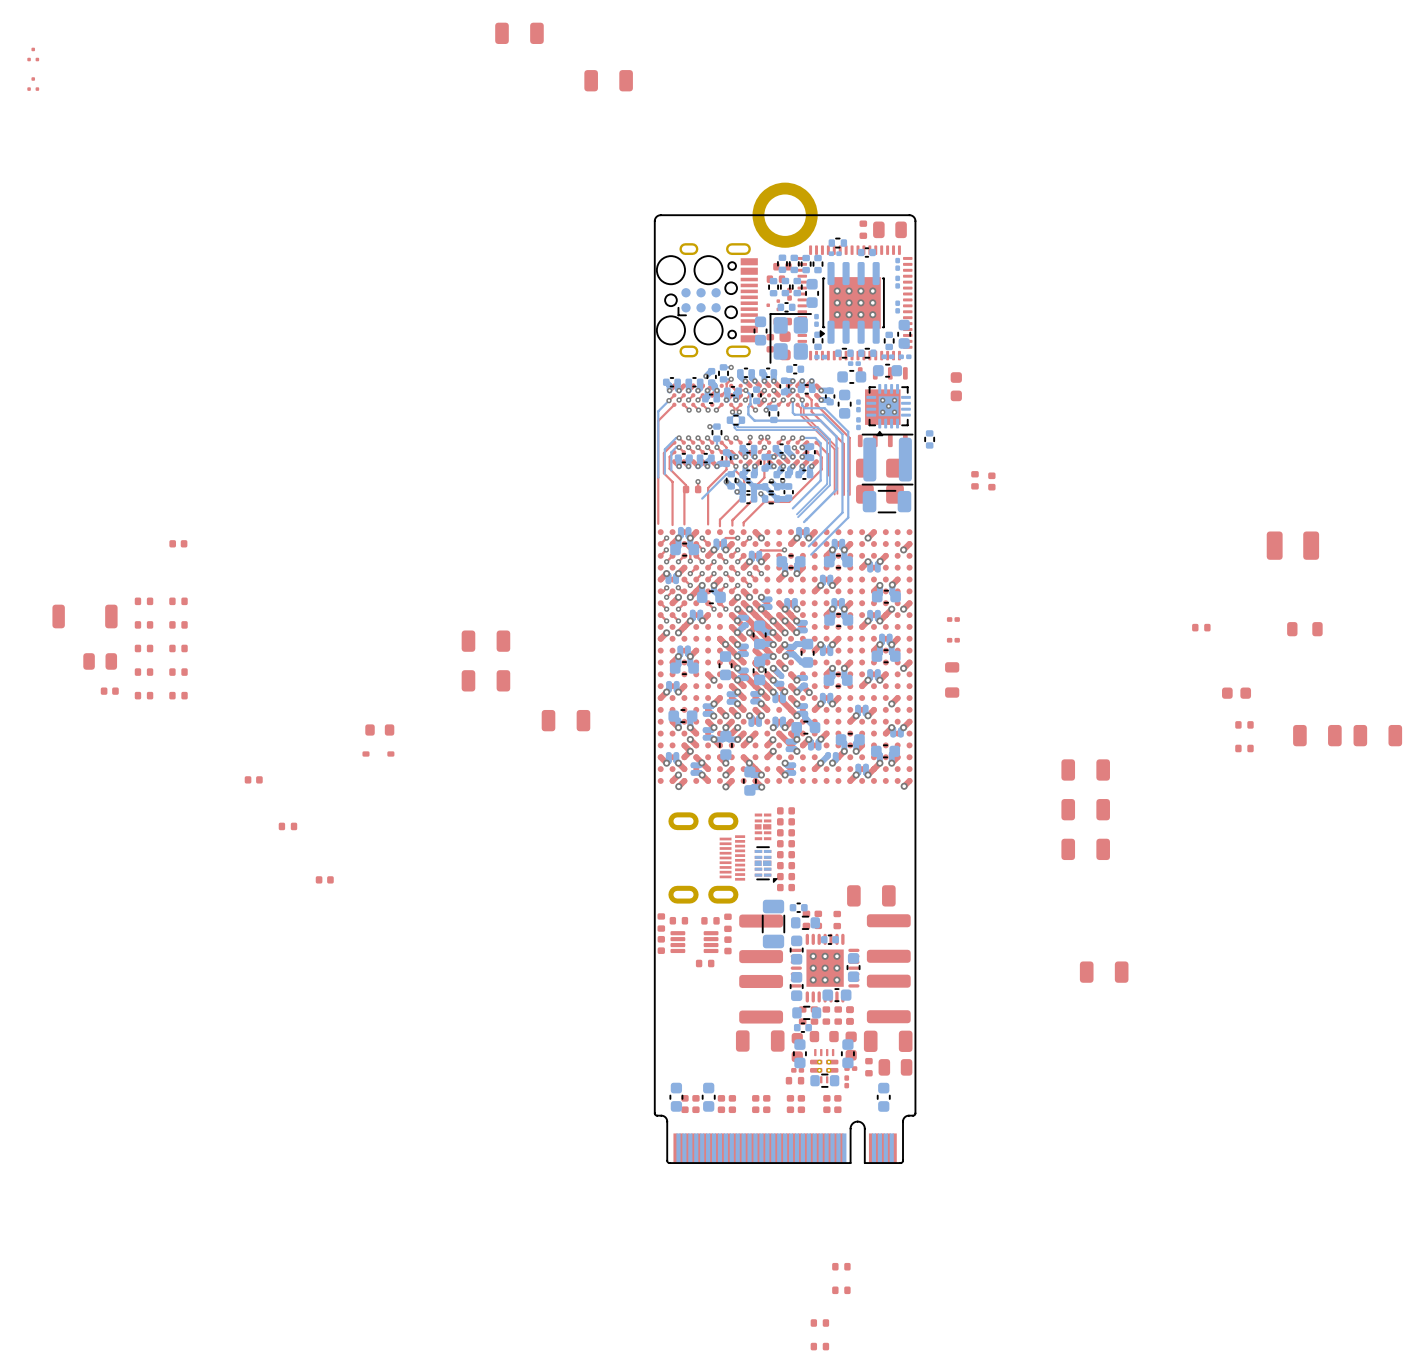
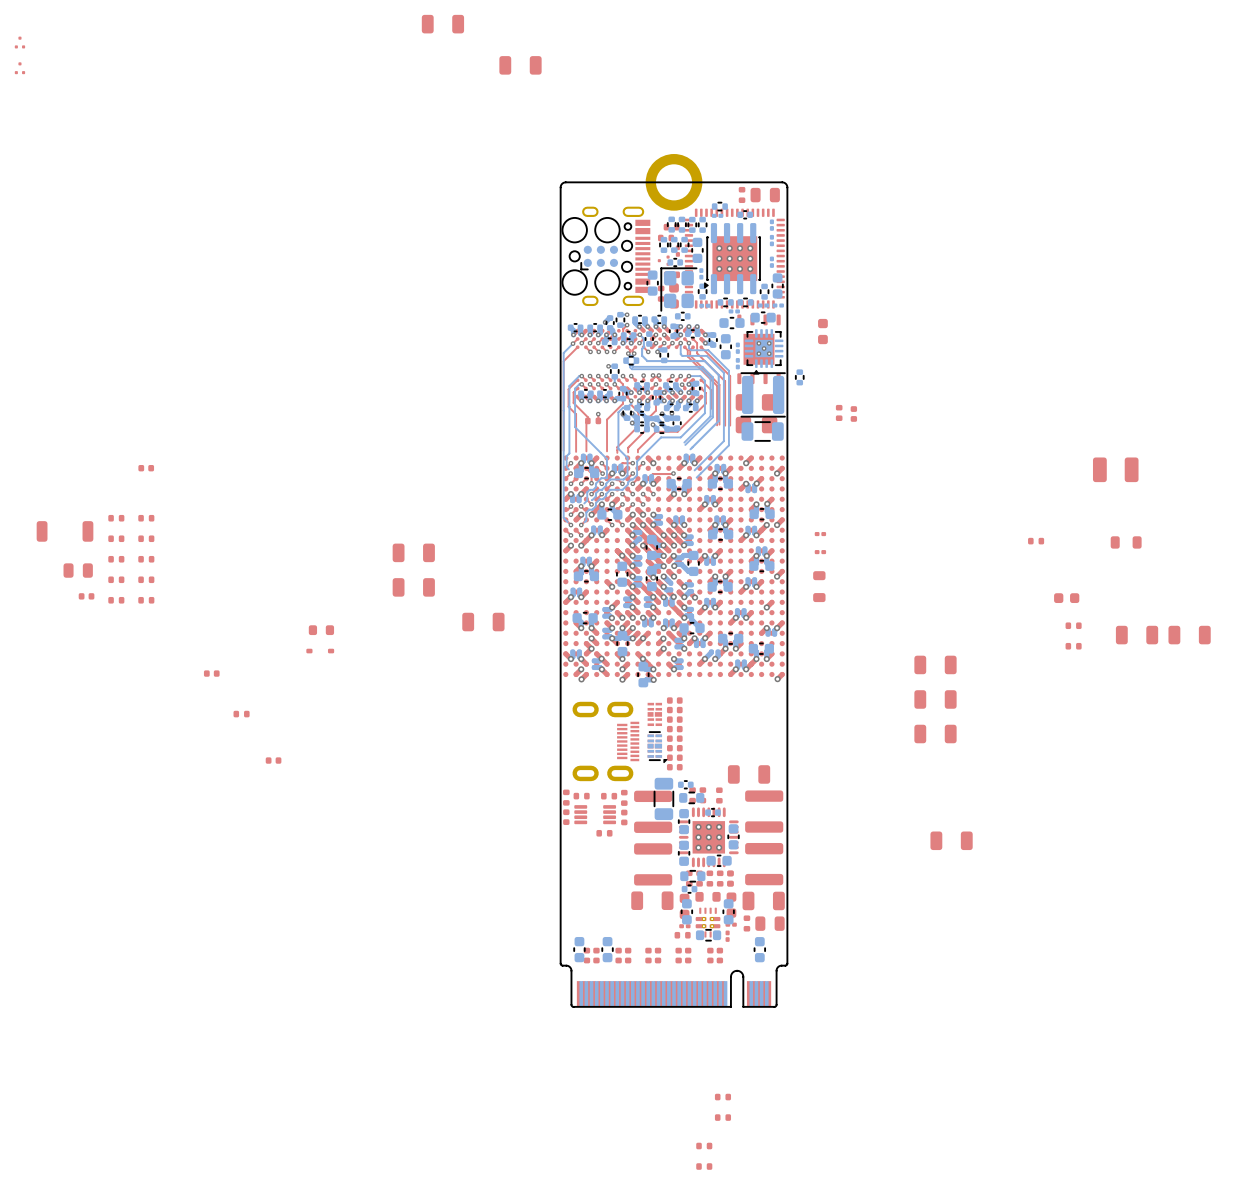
bottom track: none -> (575, 404) (575, 427) (606, 459) (606, 478) (601, 478) (593, 489) (587, 492) (587, 500) (584, 503)
bottom track: none -> (569, 407) (569, 453) (566, 456) (566, 467) (568, 469)
bottom track: none -> (563, 410) (563, 517) (567, 522)
bottom track: (721, 479) (702, 498) -> (618, 412) (618, 448) (627, 457) (627, 475) (623, 479) (610, 479) (601, 489) (595, 493) (592, 500)
bottom track: none -> (680, 437) (661, 437) (637, 461) (637, 475) (622, 489) (610, 489) (602, 499) (595, 503) (592, 509) (586, 512) (584, 522)

